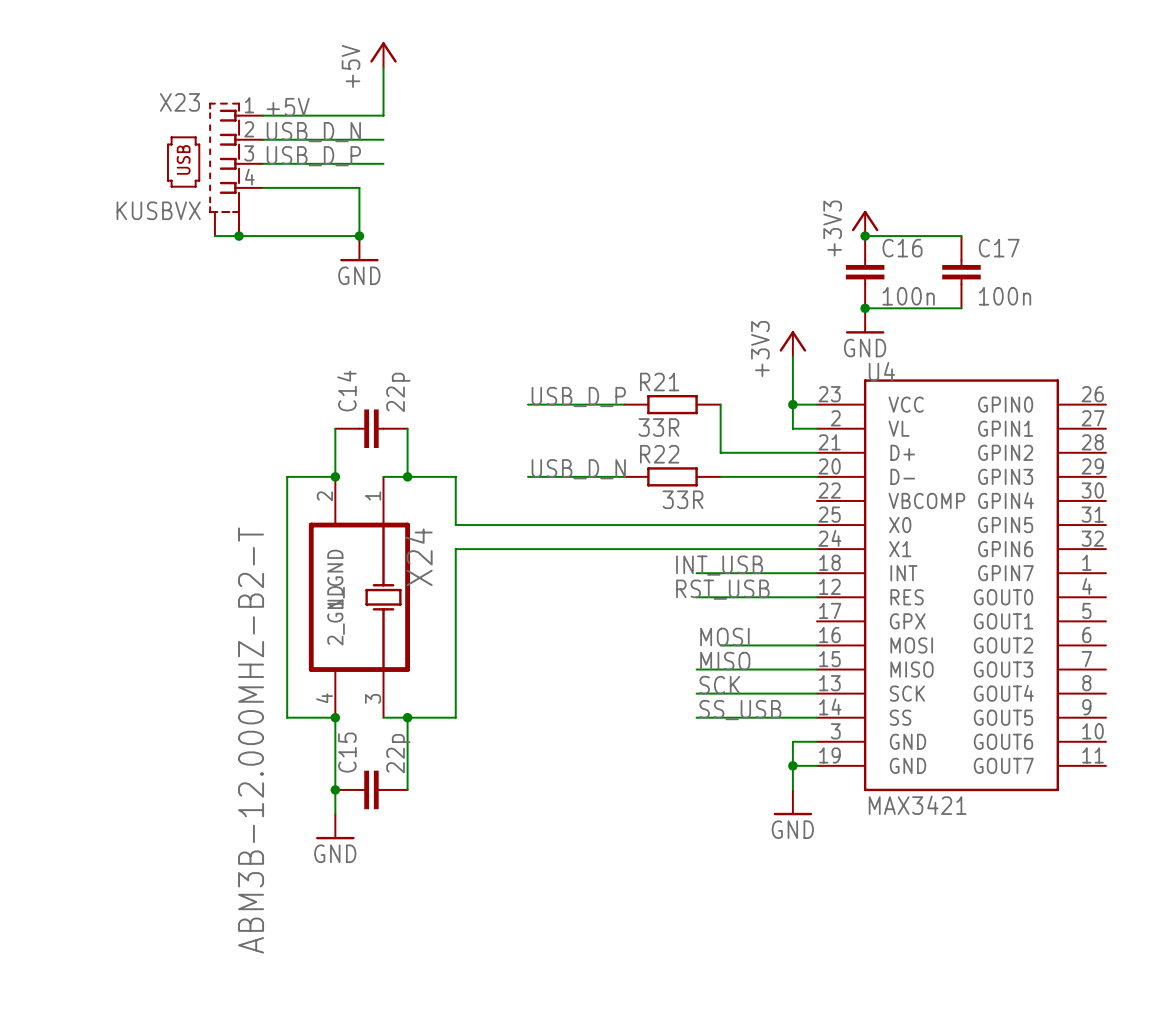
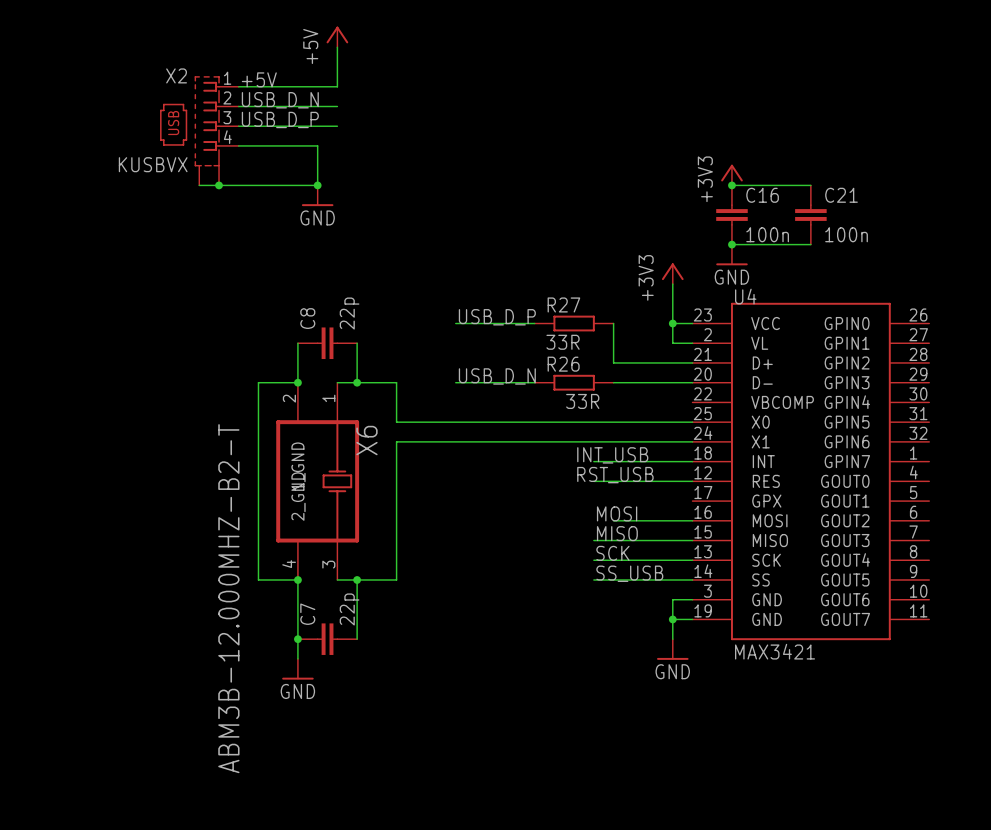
X23 name: X23 (179, 102) -> X2 (176, 75)
C17 name: C17 (999, 248) -> C21 (841, 195)
R21 name: R21 (659, 382) -> R27 (563, 304)
C14 name: C14 (346, 390) -> C8 (307, 318)
R22 name: R22 (659, 454) -> R26 (563, 364)
X24 name: X24 (419, 557) -> X6 (366, 440)
C15 name: C15 (347, 752) -> C7 (307, 614)

